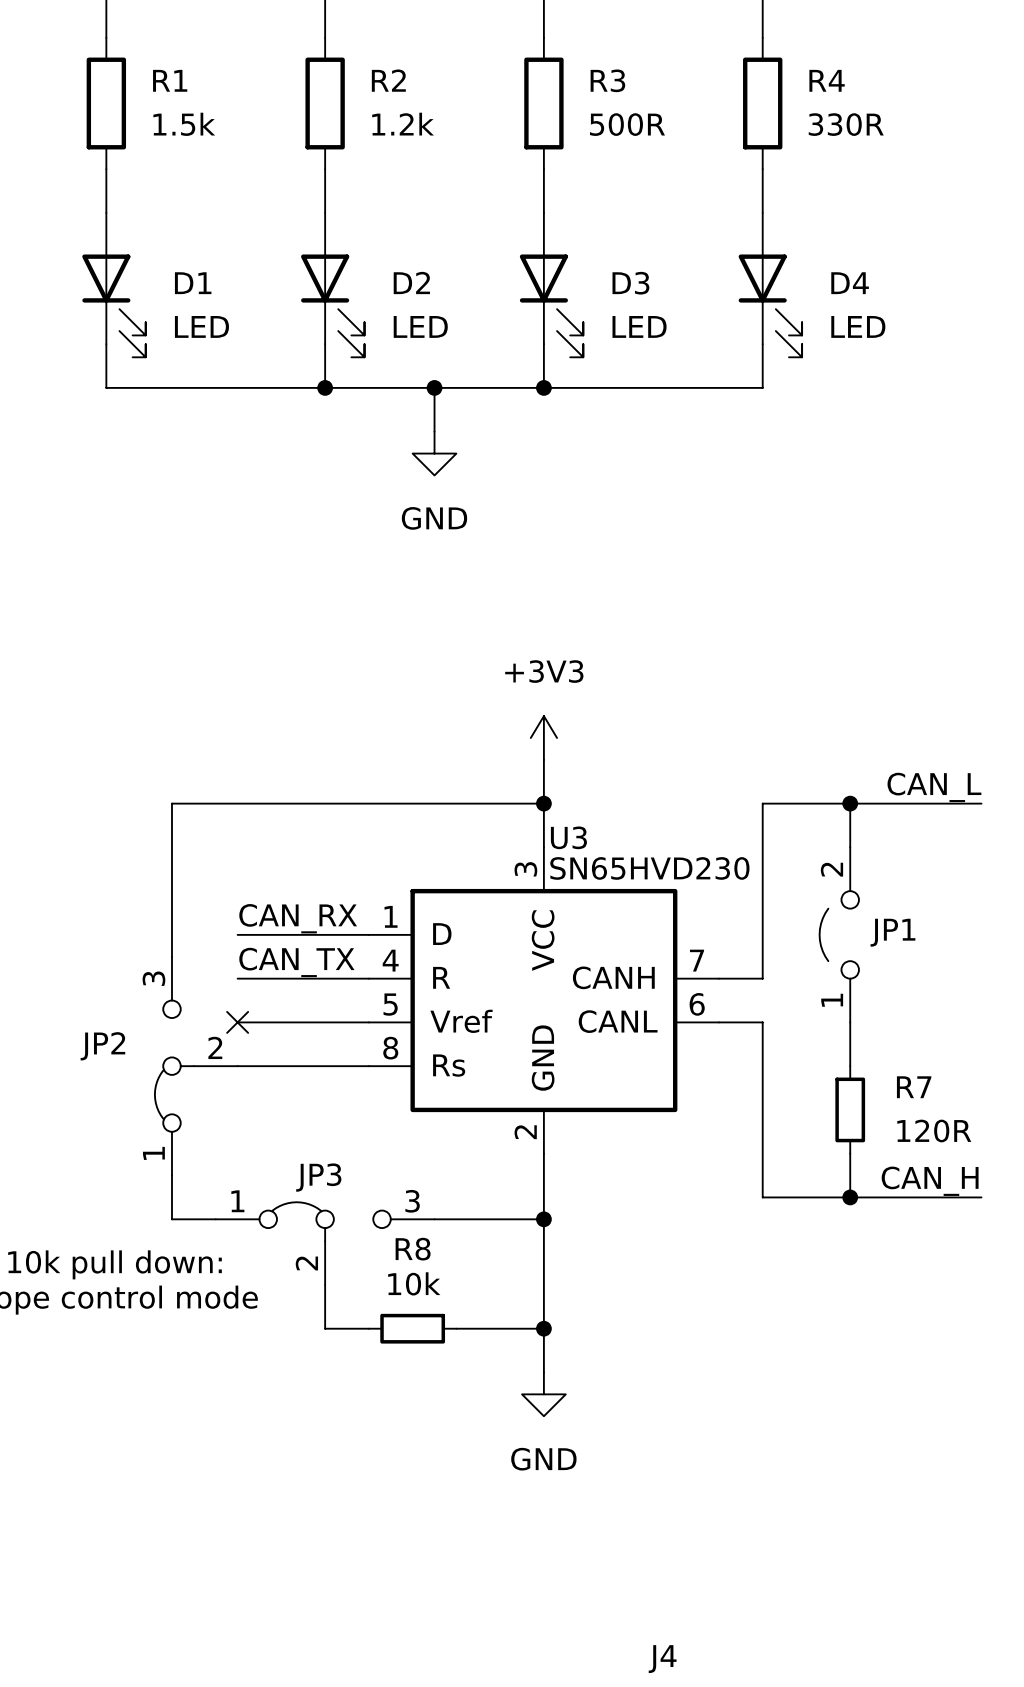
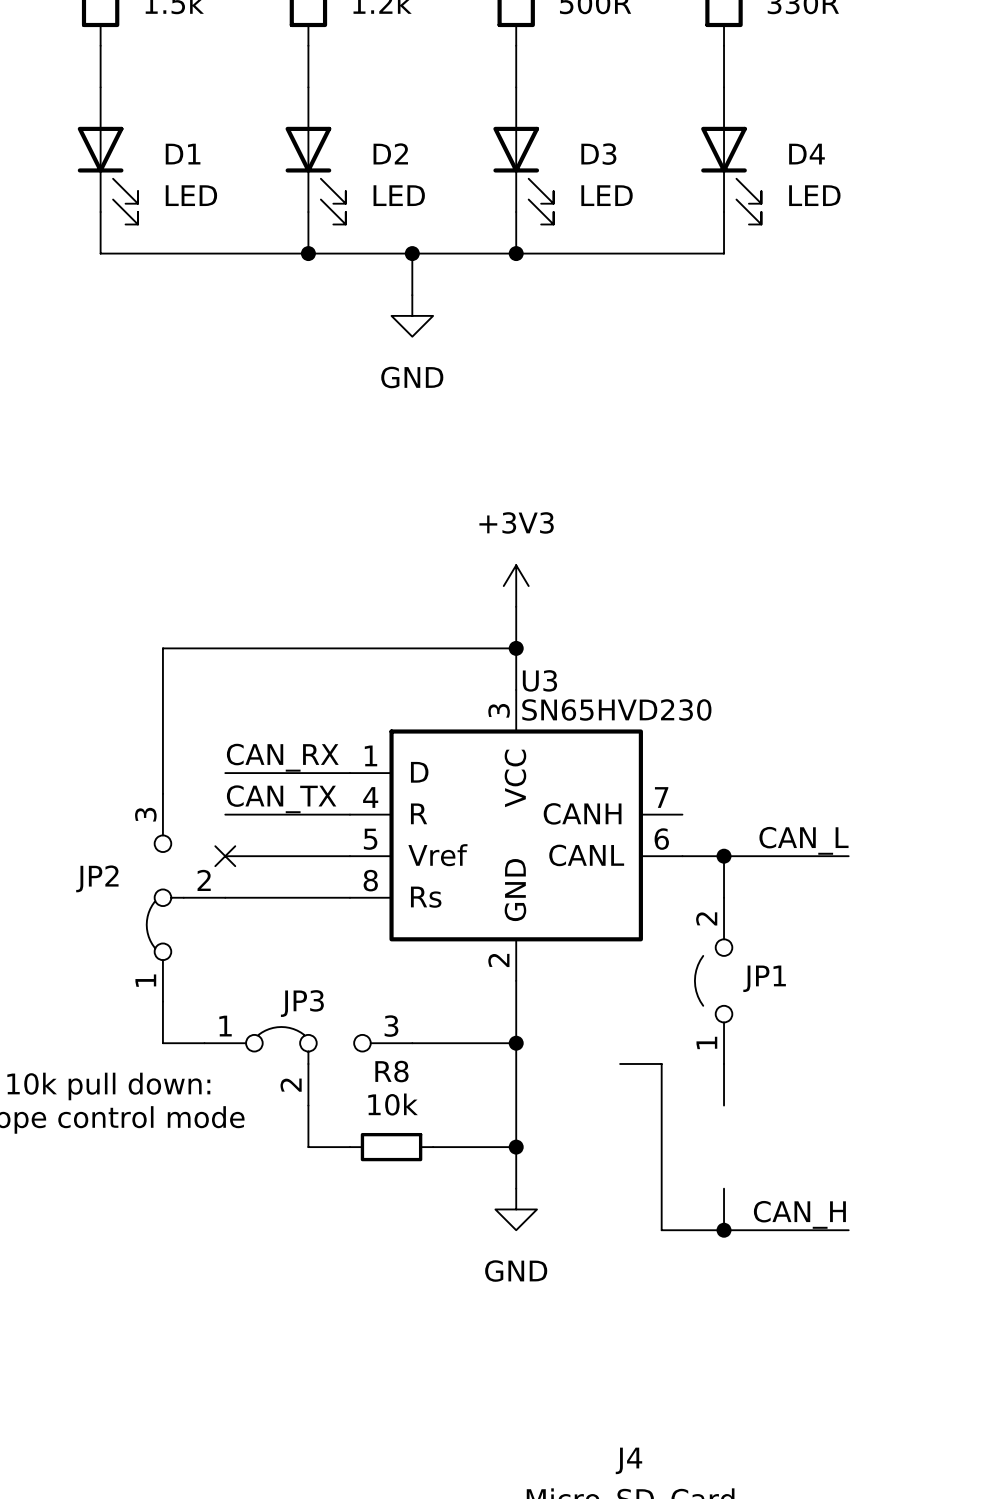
label position: CAN_L (934, 787) -> CAN_L (803, 840)
wire: (850, 803) (850, 847) -> none
junction: (850, 803) -> none
wire: (981, 803) (762, 803) (762, 978) (718, 978) -> none
JP1 position: (839, 934) -> (713, 980)
wire: none -> (724, 856) (848, 856)
junction: none -> (724, 856)
wire: (850, 1022) (850, 1066) -> (724, 1063) (724, 1105)
wire: (762, 1066) (762, 1197) (981, 1197) -> none
R7: 120R (850, 1109) -> none
wire: (850, 1153) (850, 1197) -> (724, 1188) (724, 1230)
label position: CAN_H (930, 1181) -> CAN_H (799, 1214)
junction: (850, 1197) -> none
wire: none -> (620, 1063) (661, 1063) (661, 1230) (848, 1230)
junction: none -> (724, 1230)

